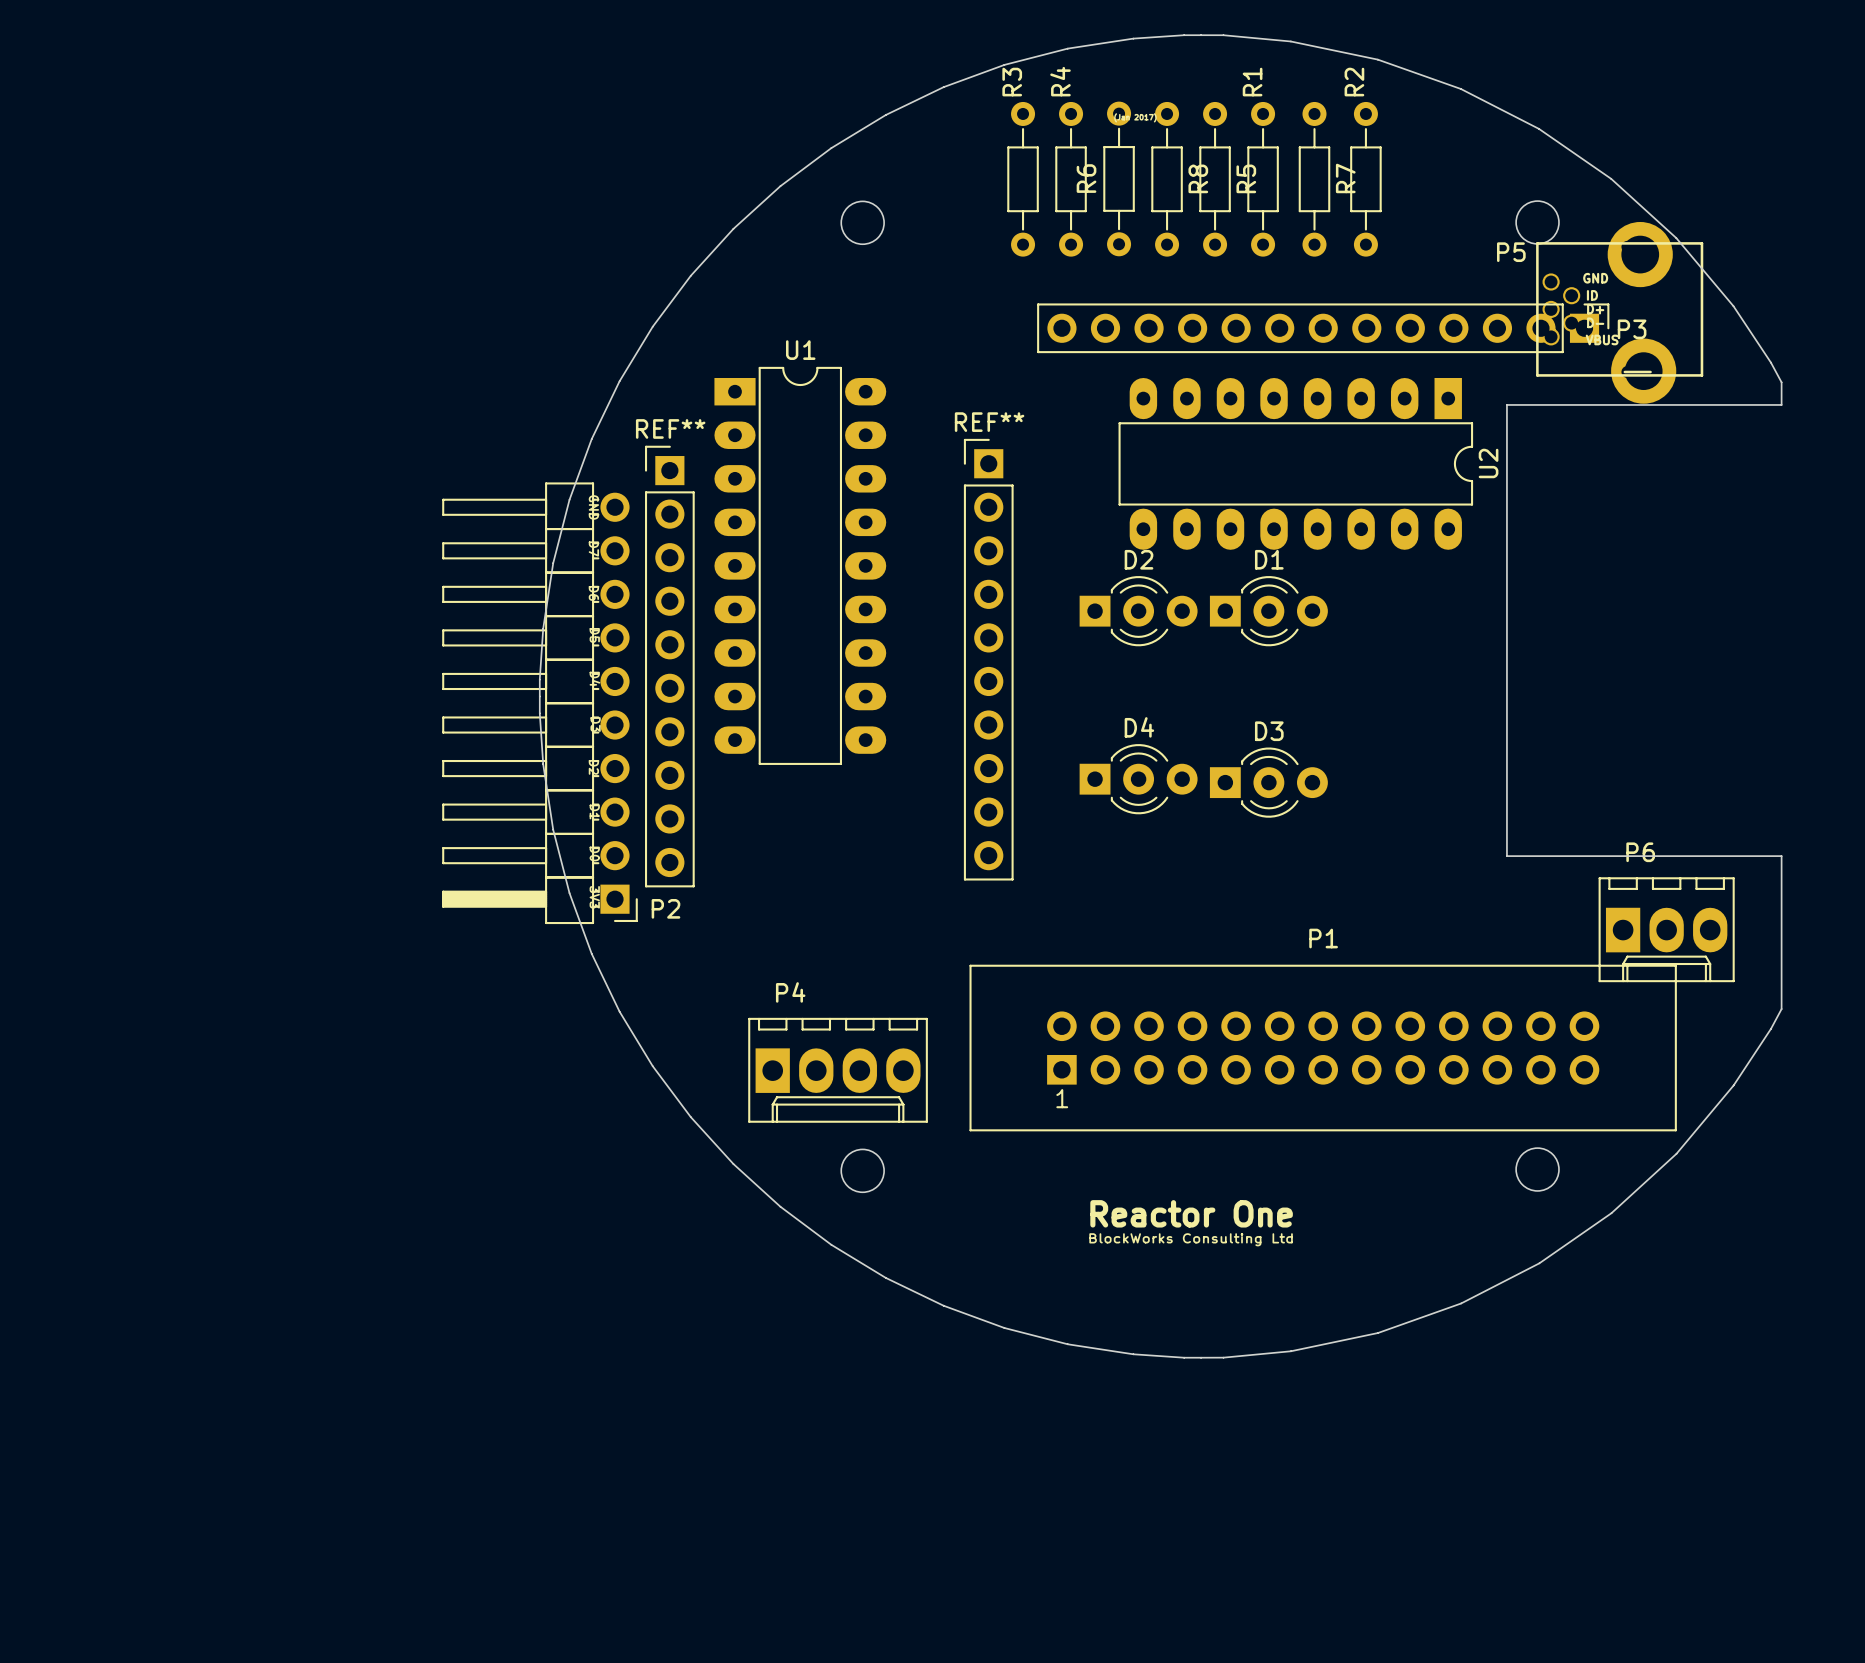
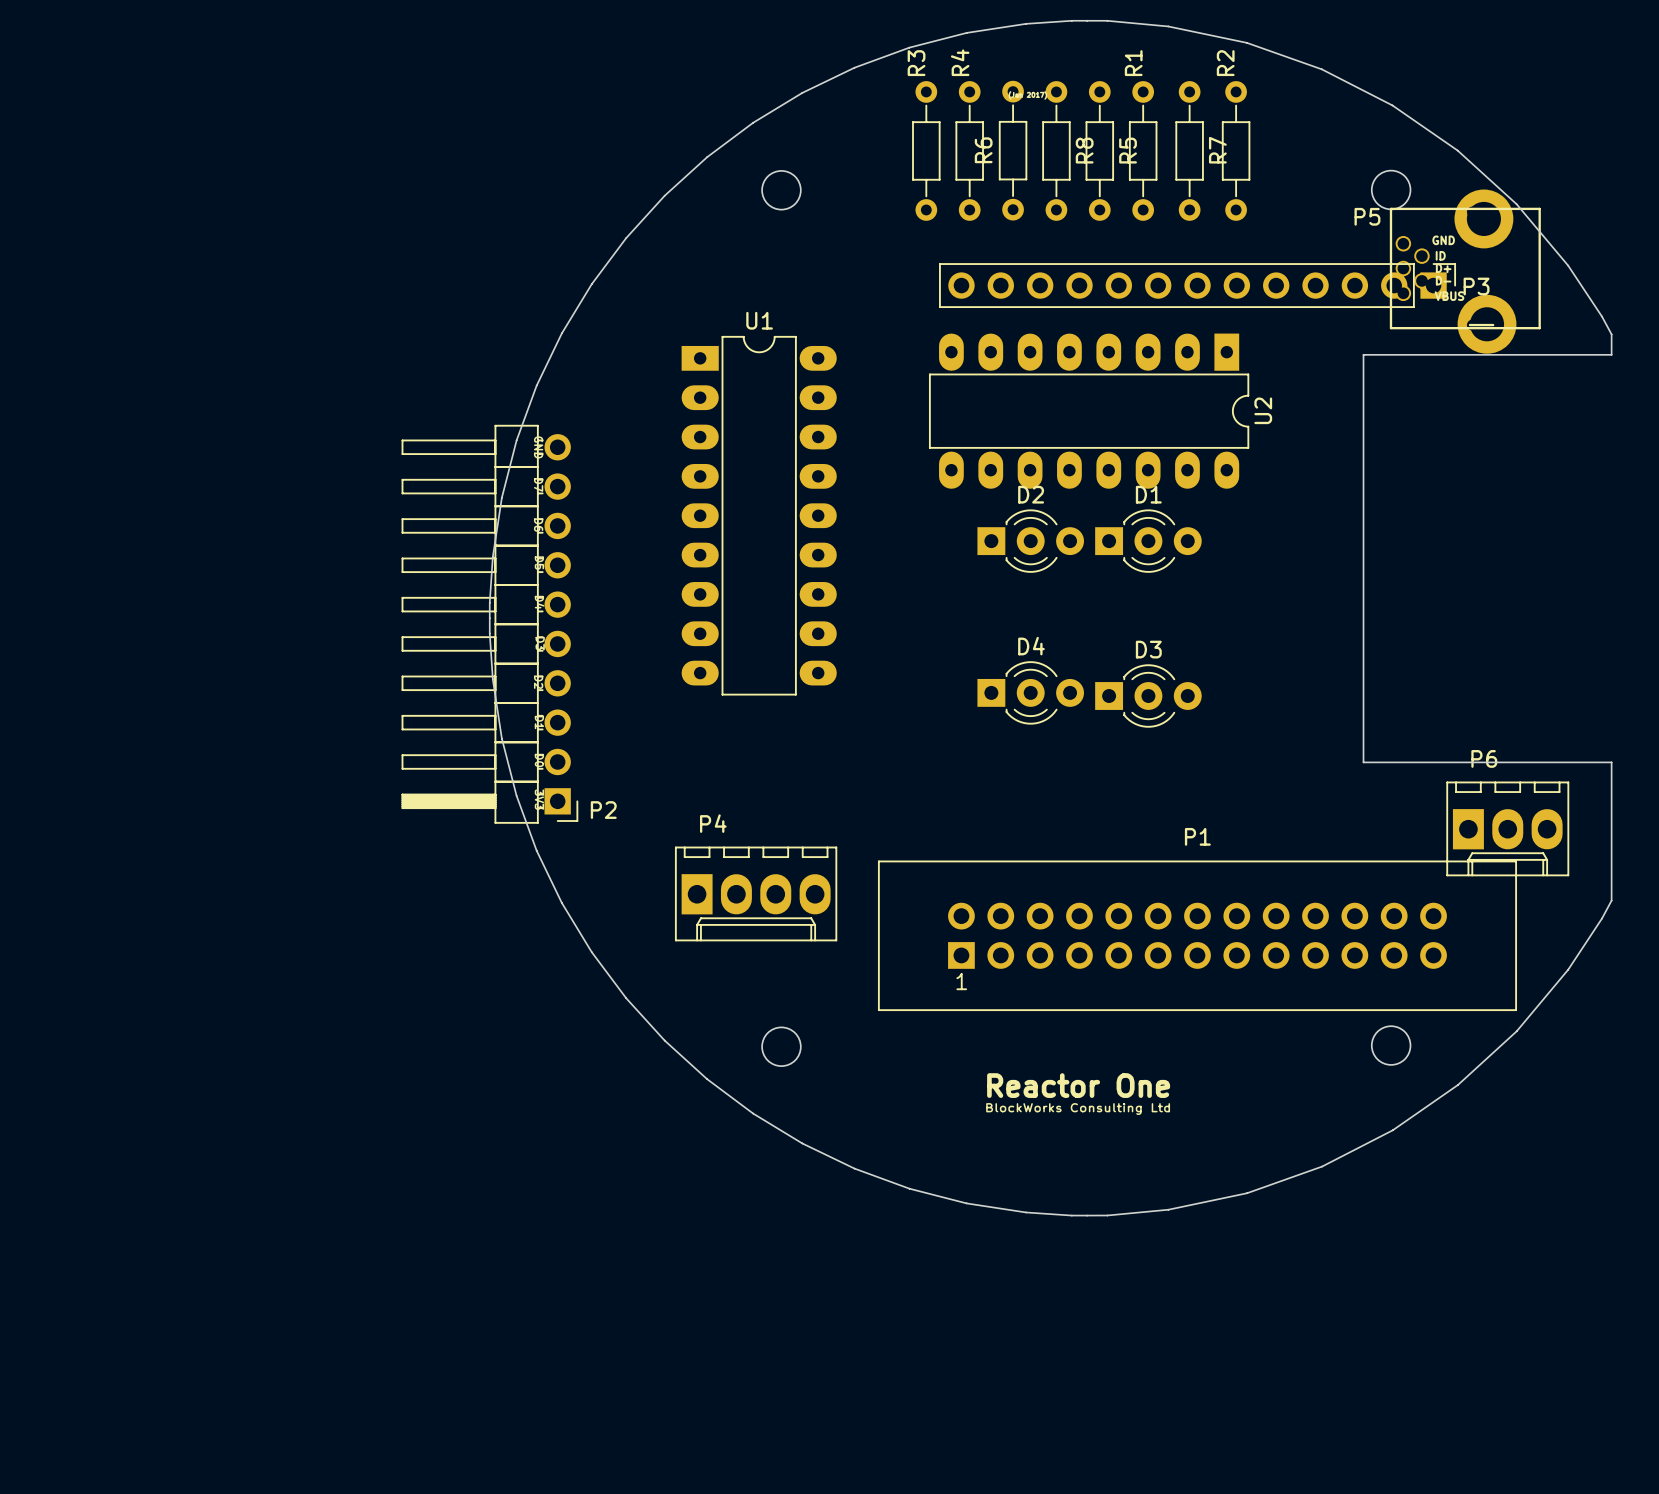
U2 position: (1295, 463) -> (1089, 411)
U1 position: (800, 565) -> (759, 515)
REF**: (988, 659) -> none
REF**: (669, 666) -> none
P4 position: (838, 1070) -> (756, 893)

